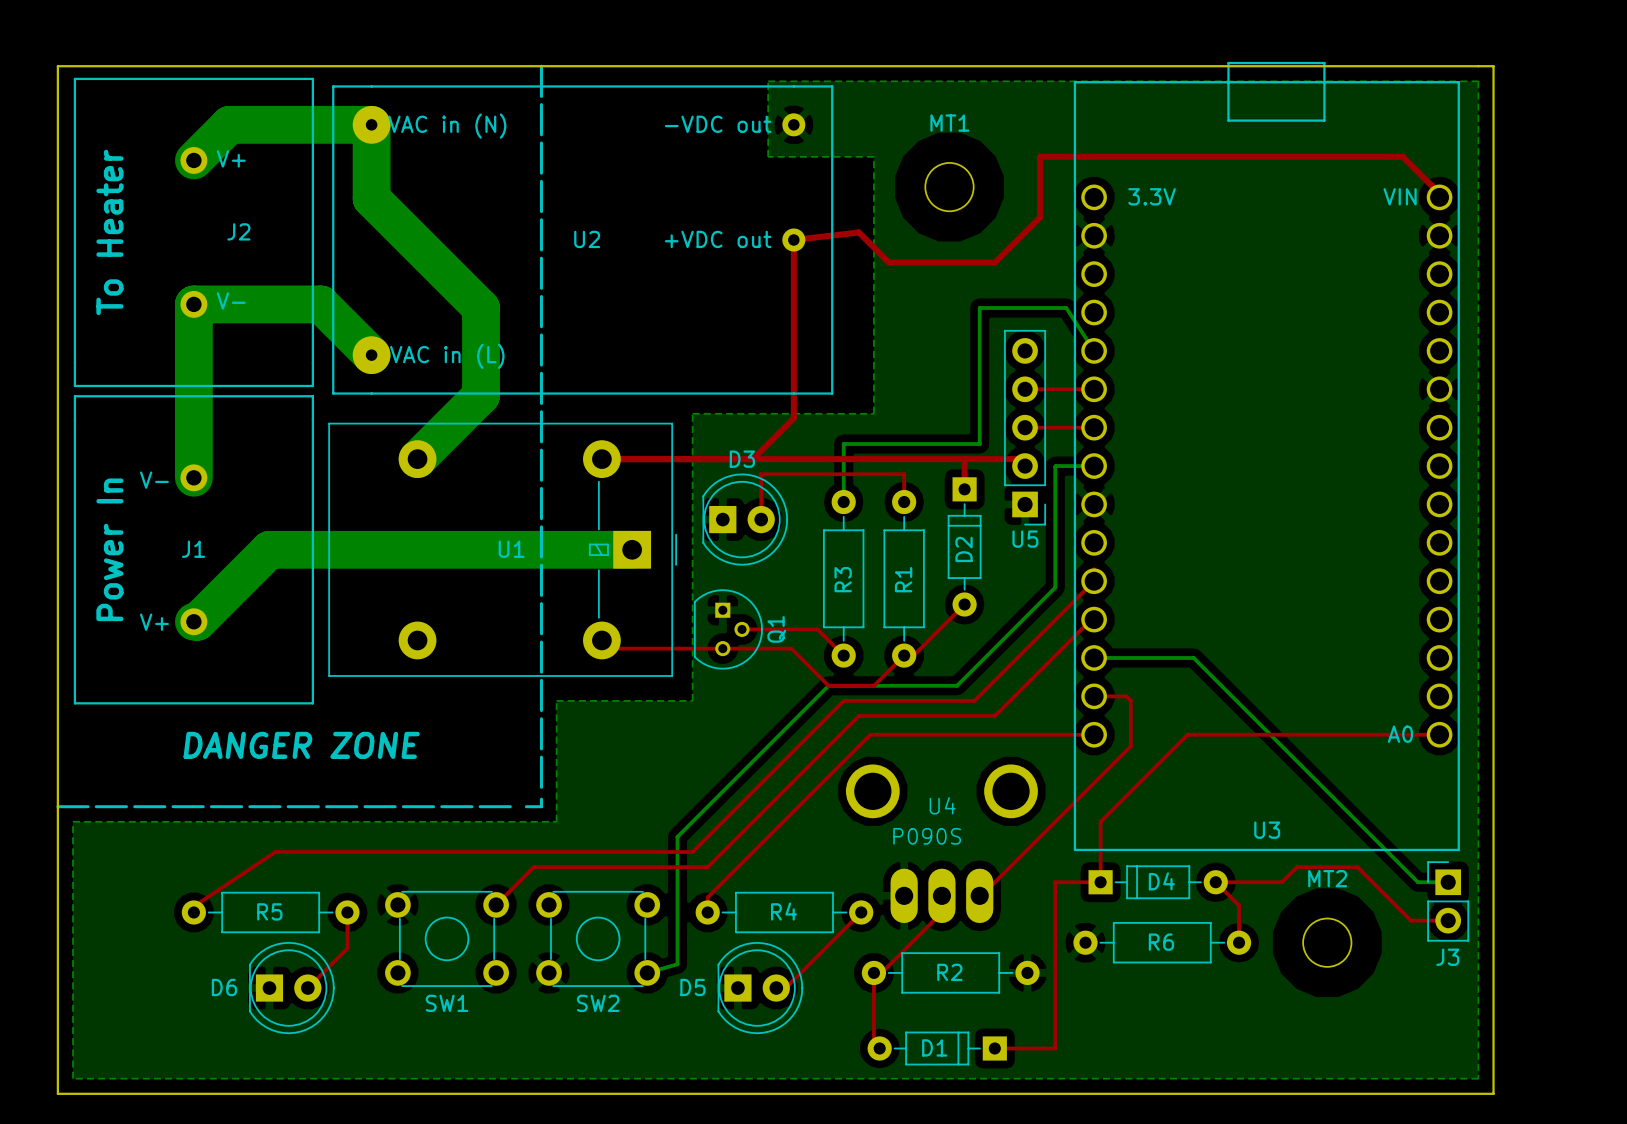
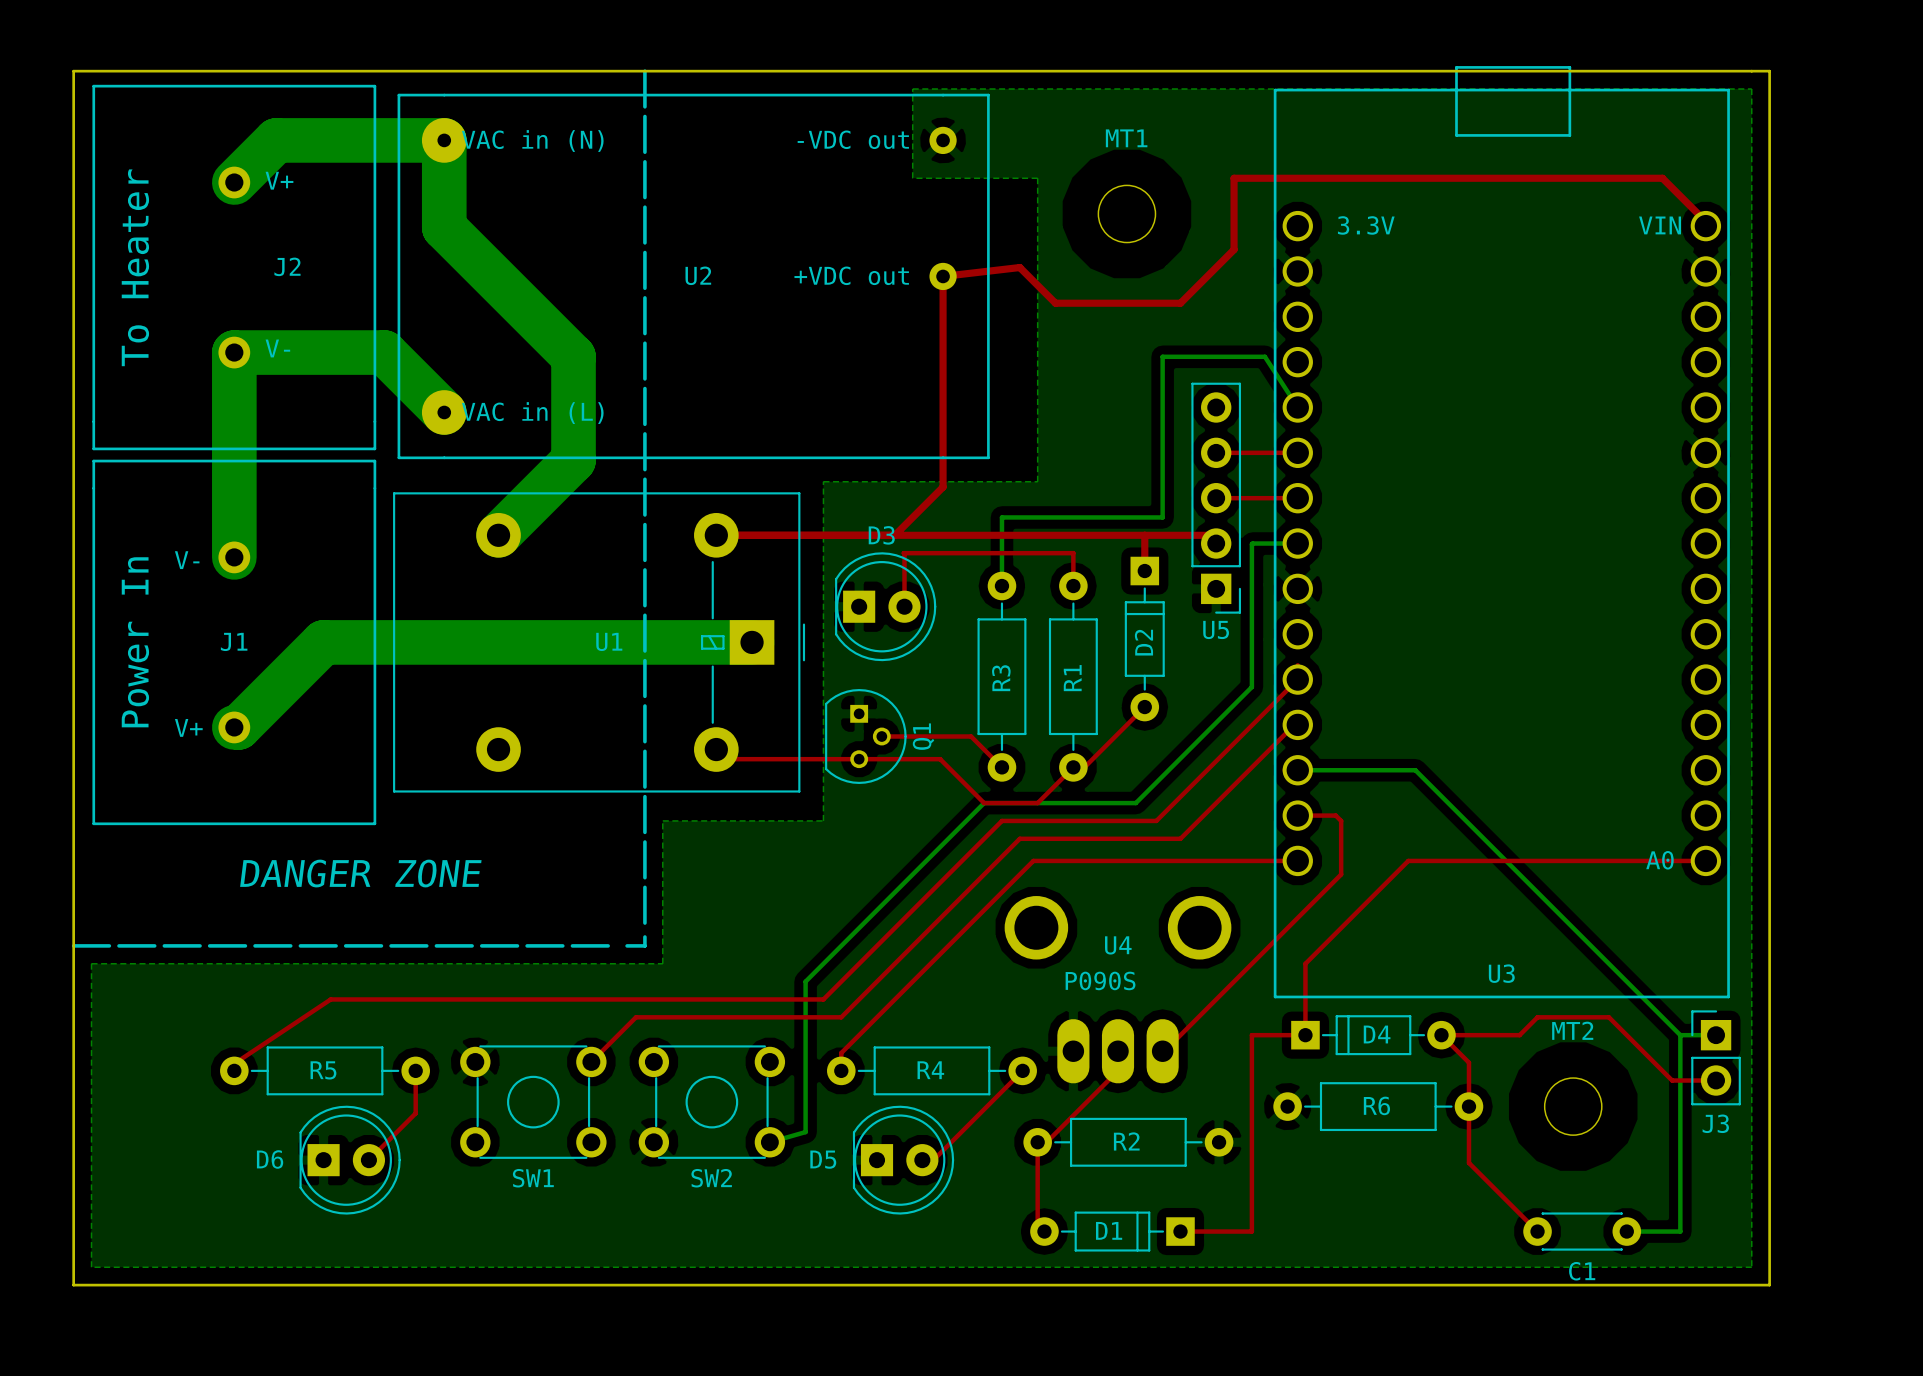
bottom track: none -> (1680, 1035) (1680, 1231) (1626, 1231)
top track: none -> (1468, 1106) (1468, 1162) (1537, 1231)
C1: none -> (1582, 1231)

